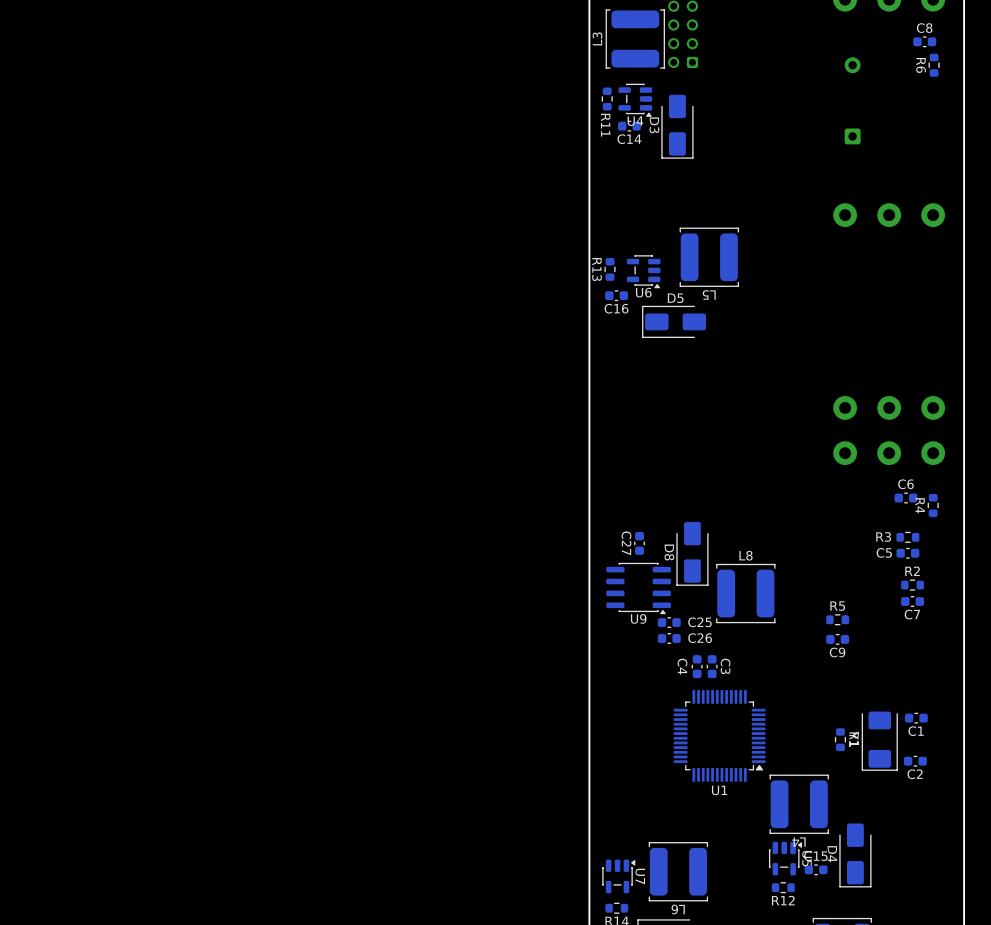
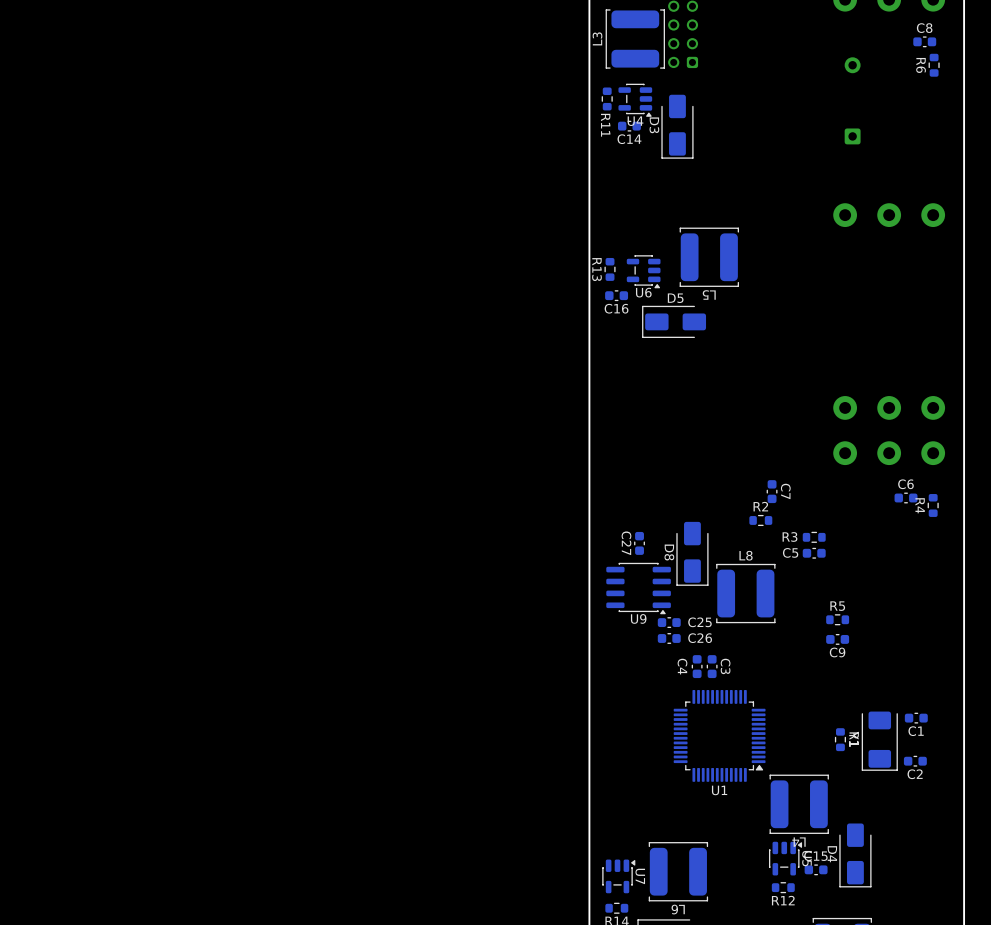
R3 position: (907, 537) -> (814, 537)
C5 position: (907, 553) -> (814, 553)
R2 position: (912, 585) -> (760, 520)
C7 rotation: 0° (912, 601) -> 90° clockwise (772, 491)
C7 position: (912, 601) -> (772, 491)
C7 name position: C7 (912, 614) -> C7 (785, 491)

